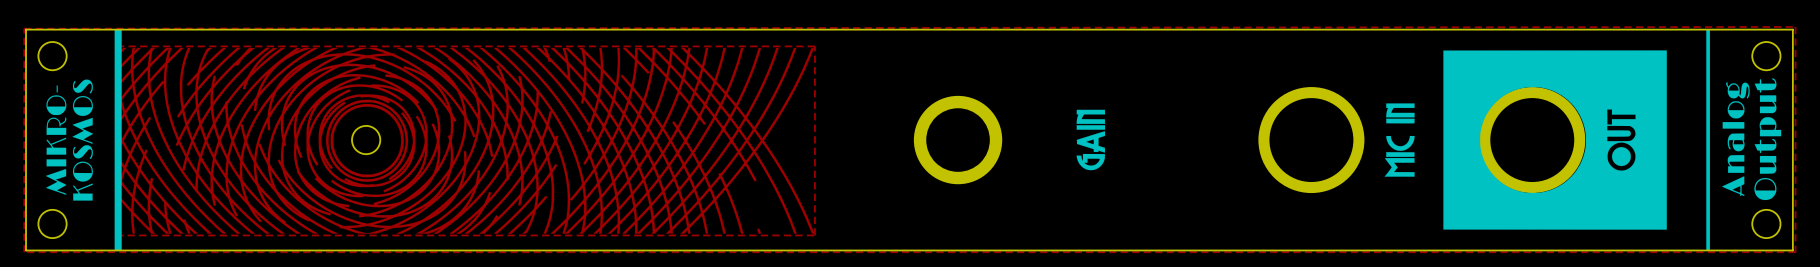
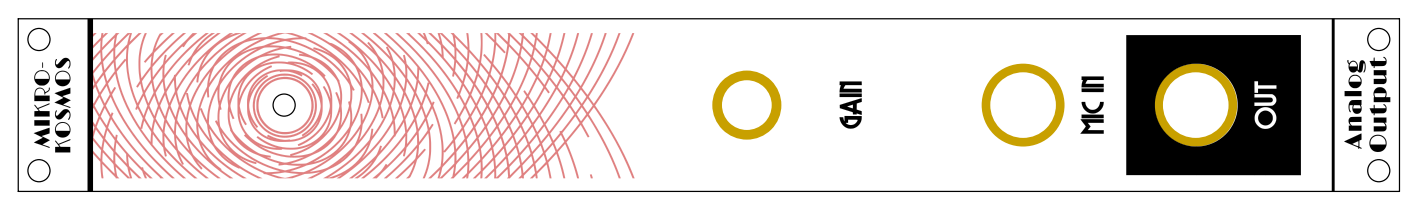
zone outline: (1795, 26) (24, 28) (24, 252) (1795, 252) (1795, 26) -> none
zone outline: (116, 46) (814, 46) (814, 235) (116, 235) (116, 46) -> none

